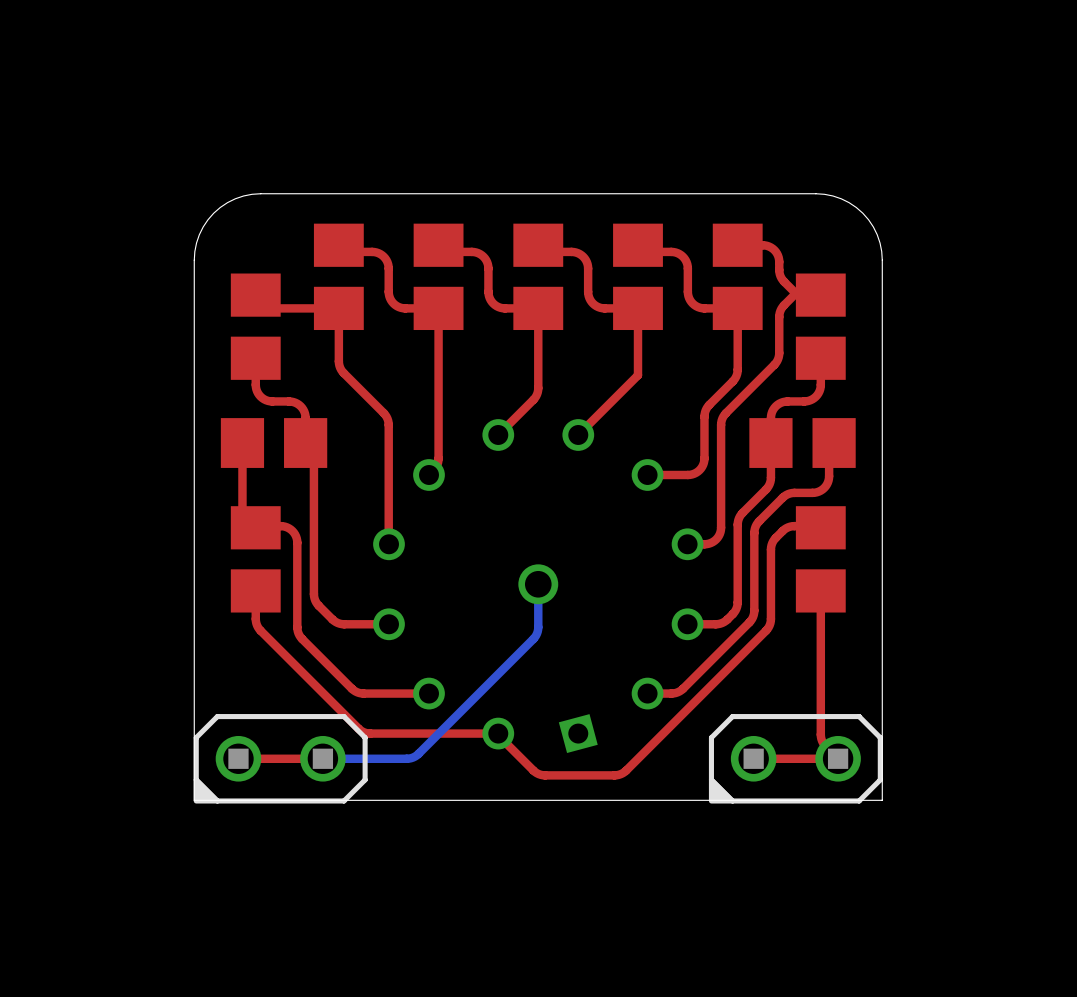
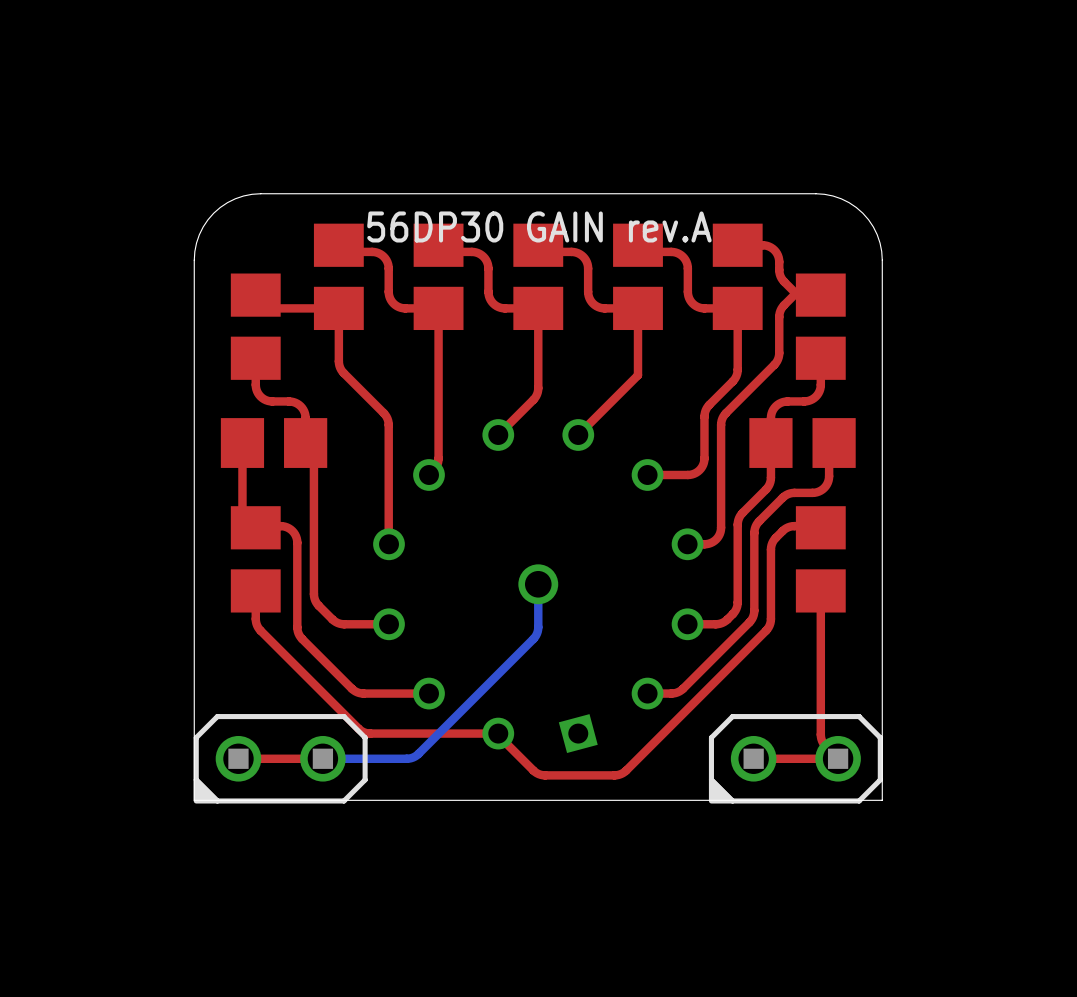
drawing: none -> [367, 211, 712, 243]

